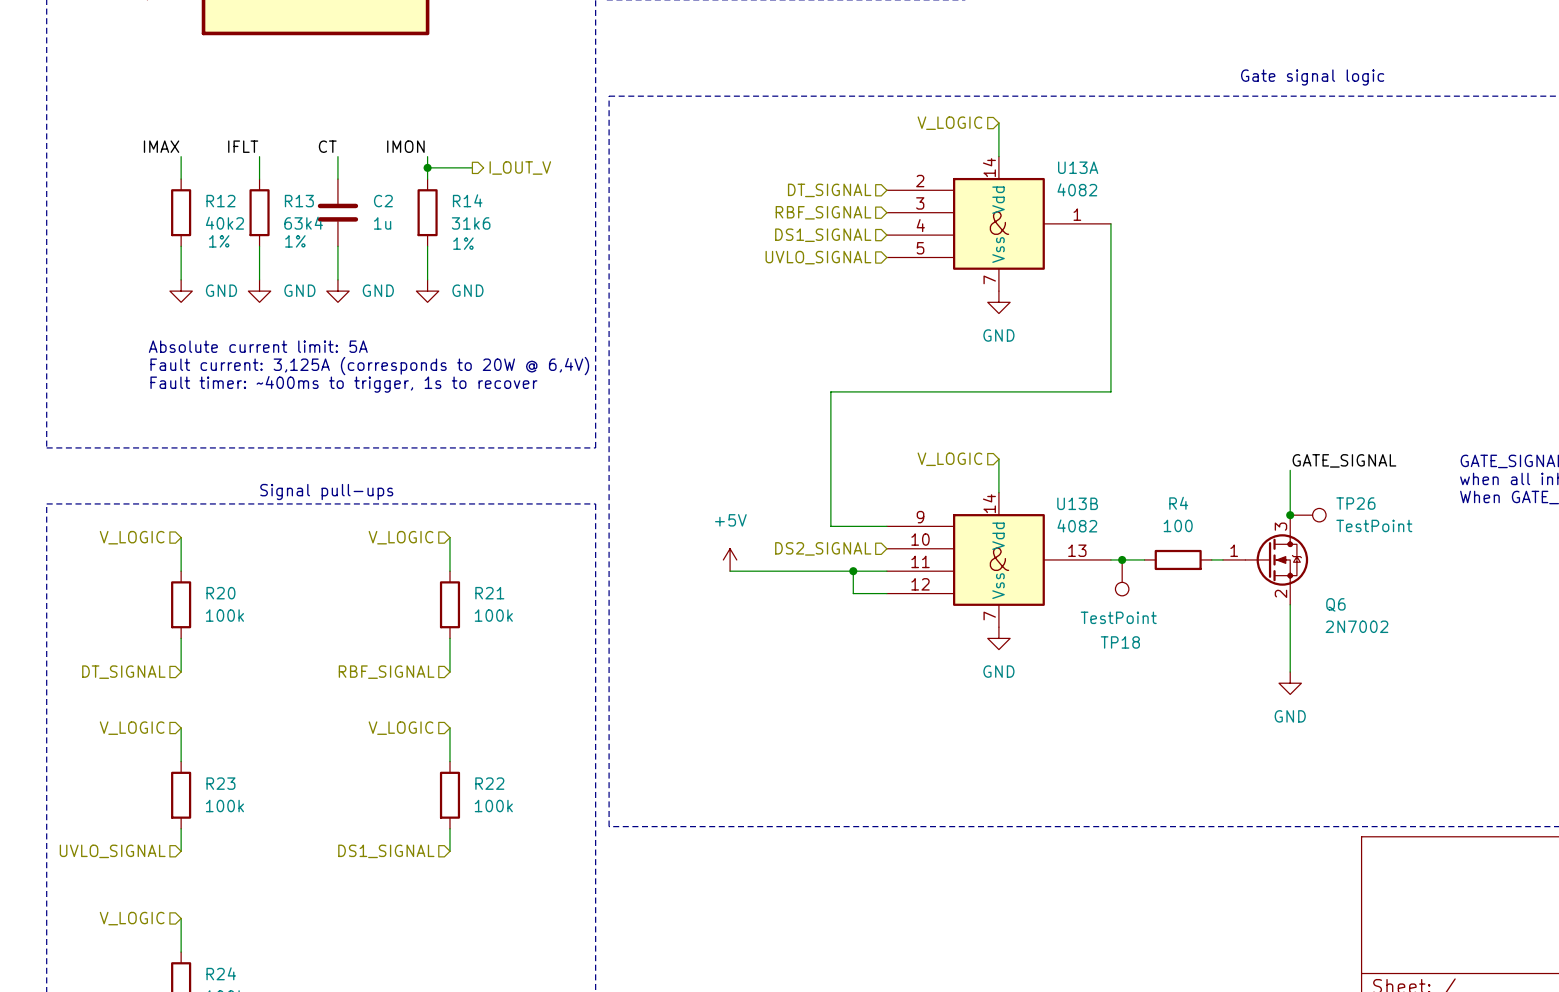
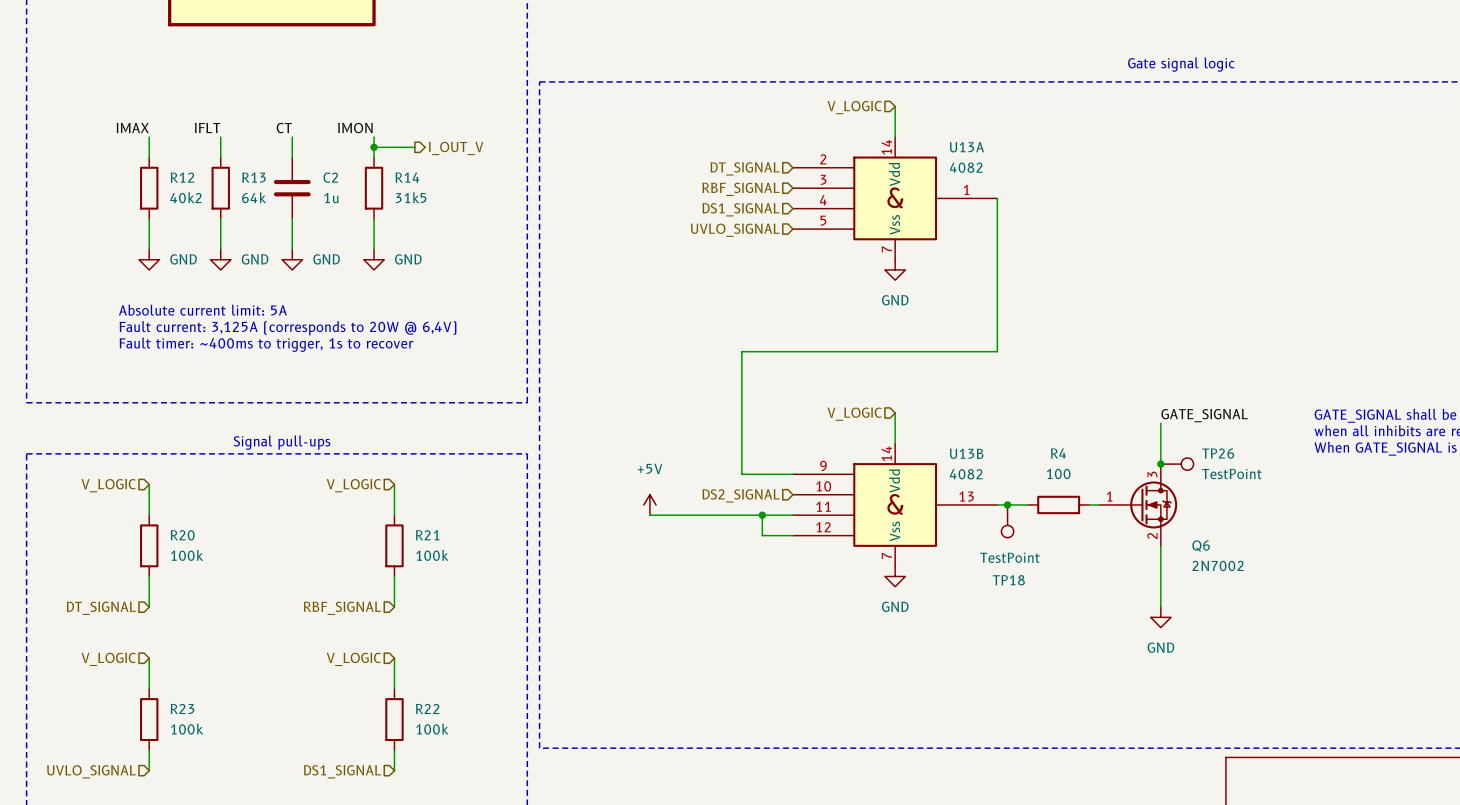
R13 value: 63k4 (303, 223) -> 64k (254, 197)
R14 value: 31k6 (471, 223) -> 31k5 (411, 197)
R12 text: 1% (219, 241) -> none
R13 text: 1% (295, 241) -> none
R14 text: 1% (463, 243) -> none

